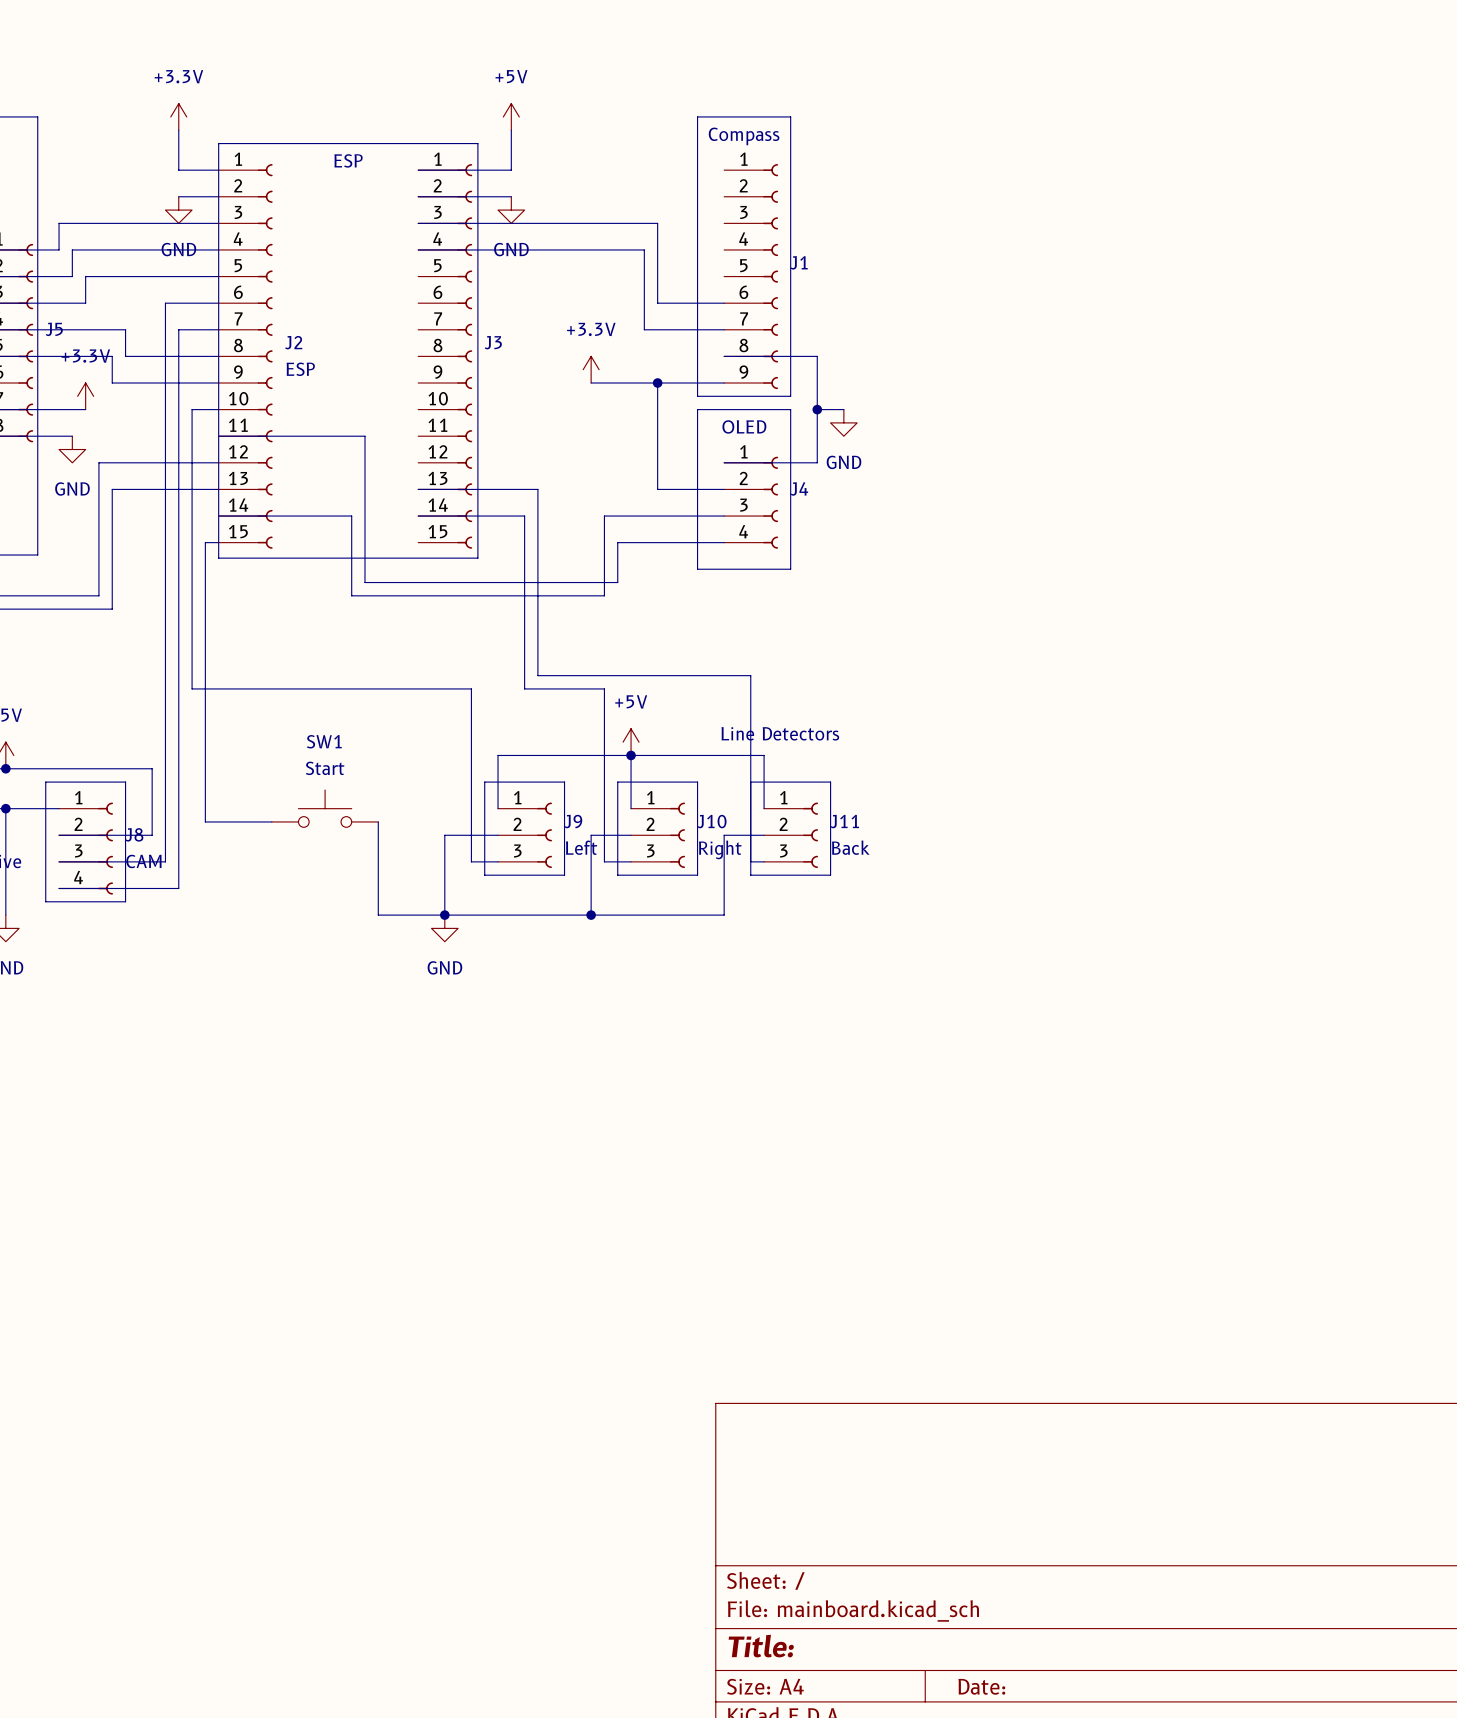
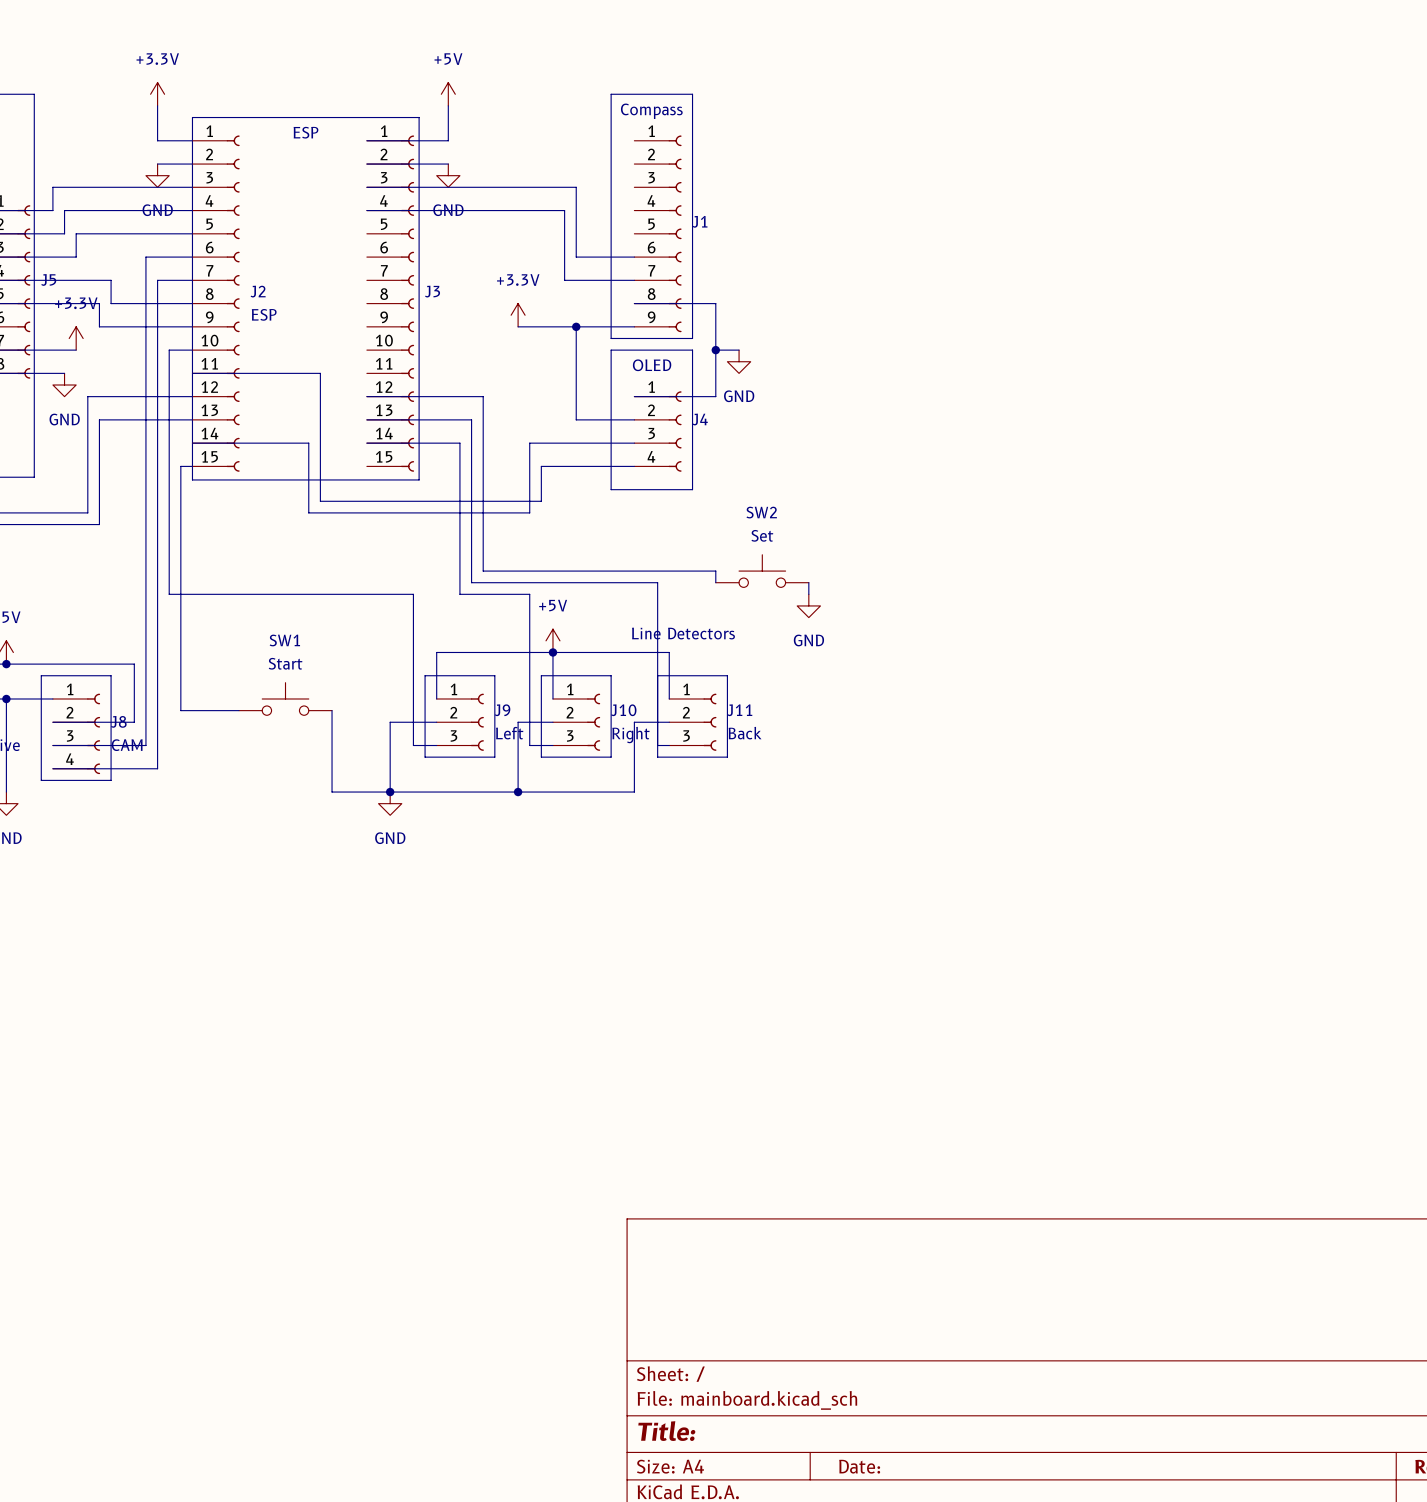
wire: none -> (366, 396) (483, 396) (483, 571) (715, 571) (715, 582)
SW2: none -> Set (762, 571)
wire: none -> (808, 582) (808, 594)
power symbol: none -> GND (808, 605)

